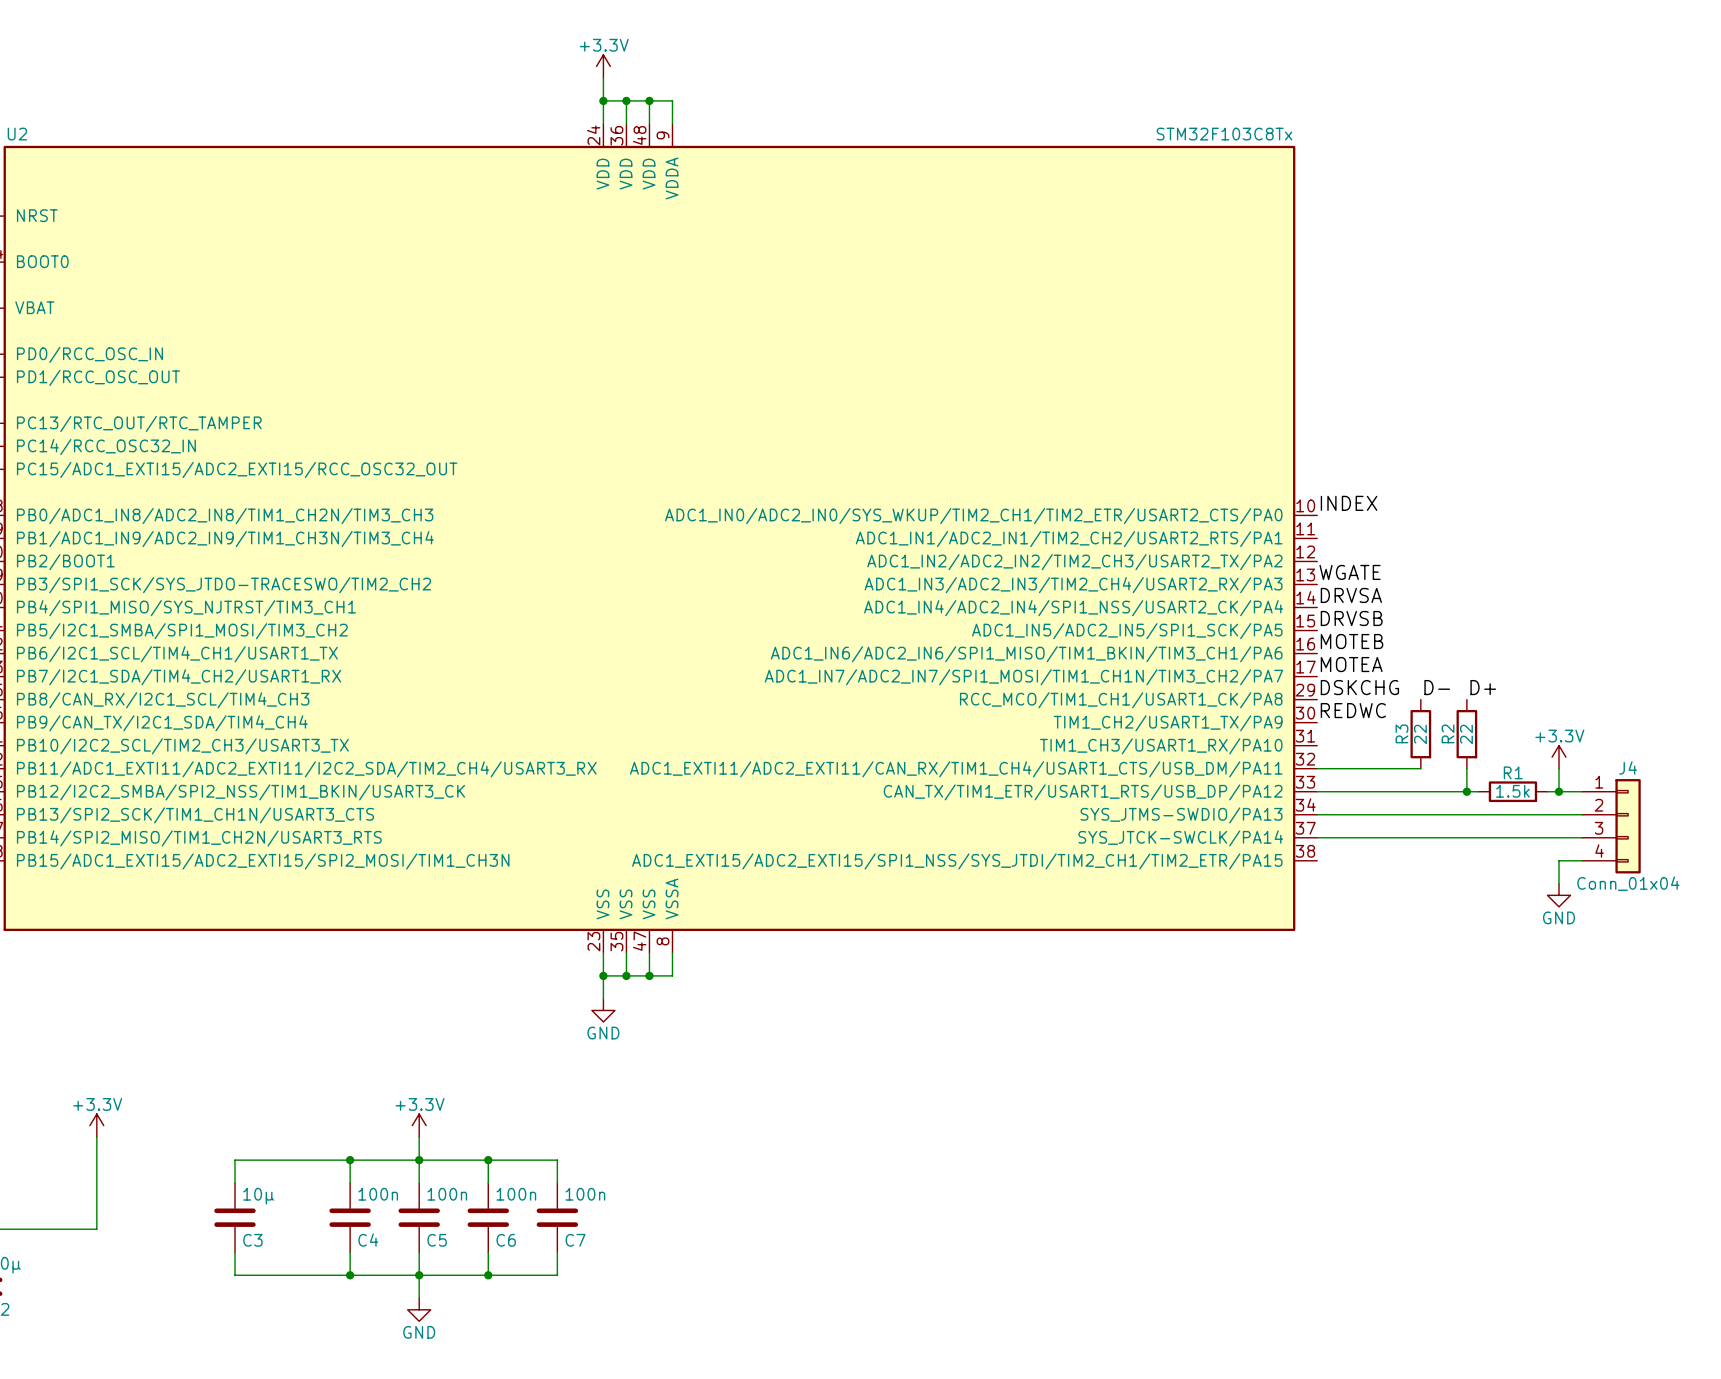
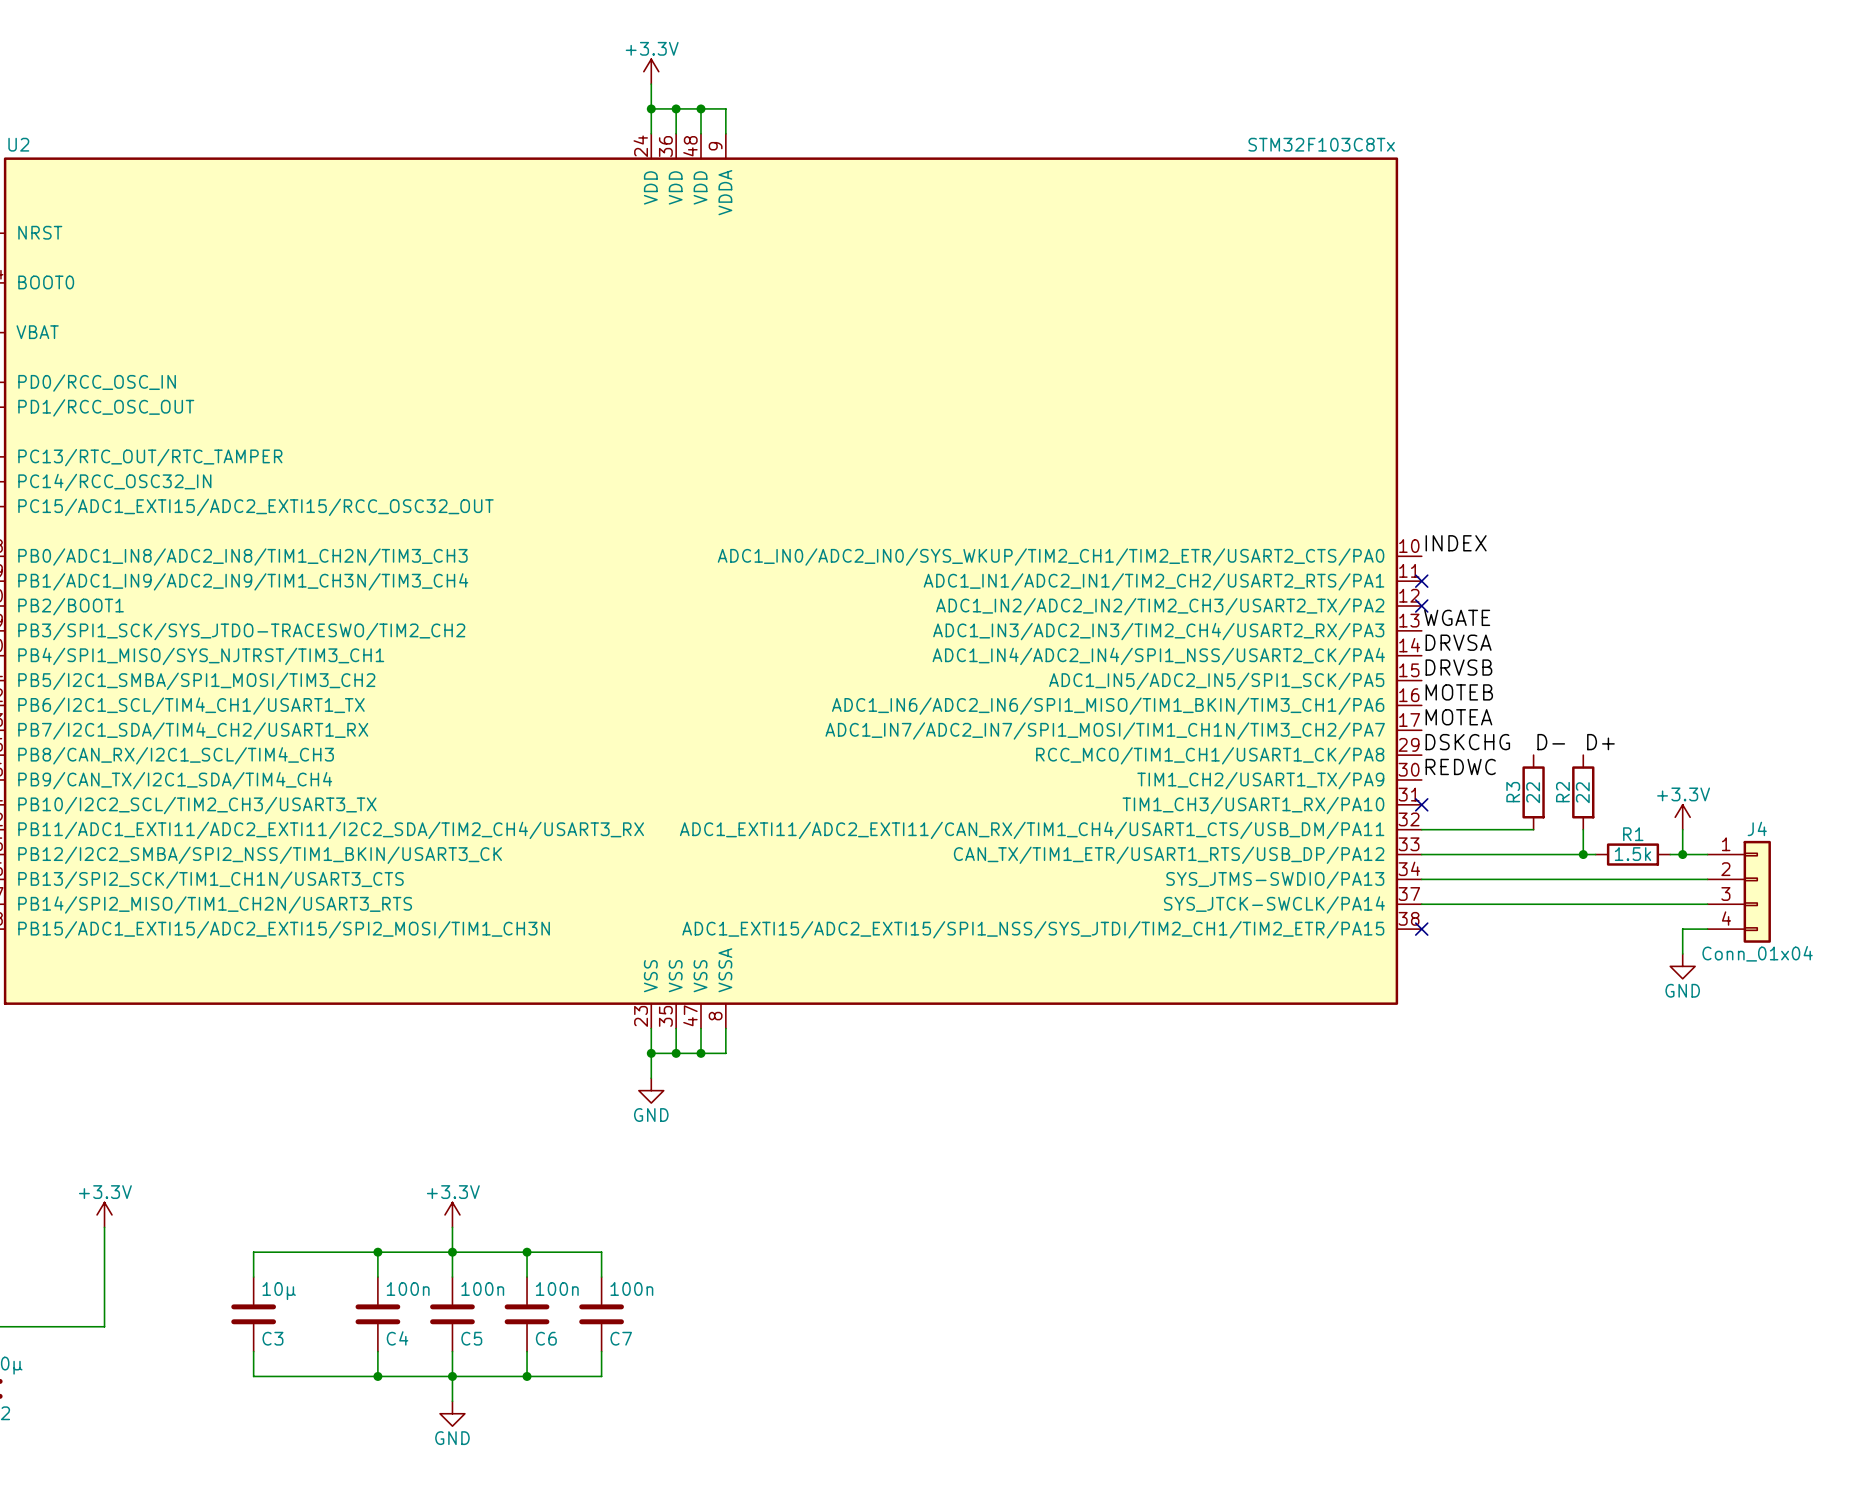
no-connect mark: none -> (1421, 581)
no-connect mark: none -> (1421, 606)
no-connect mark: none -> (1421, 804)
no-connect mark: none -> (1421, 929)

